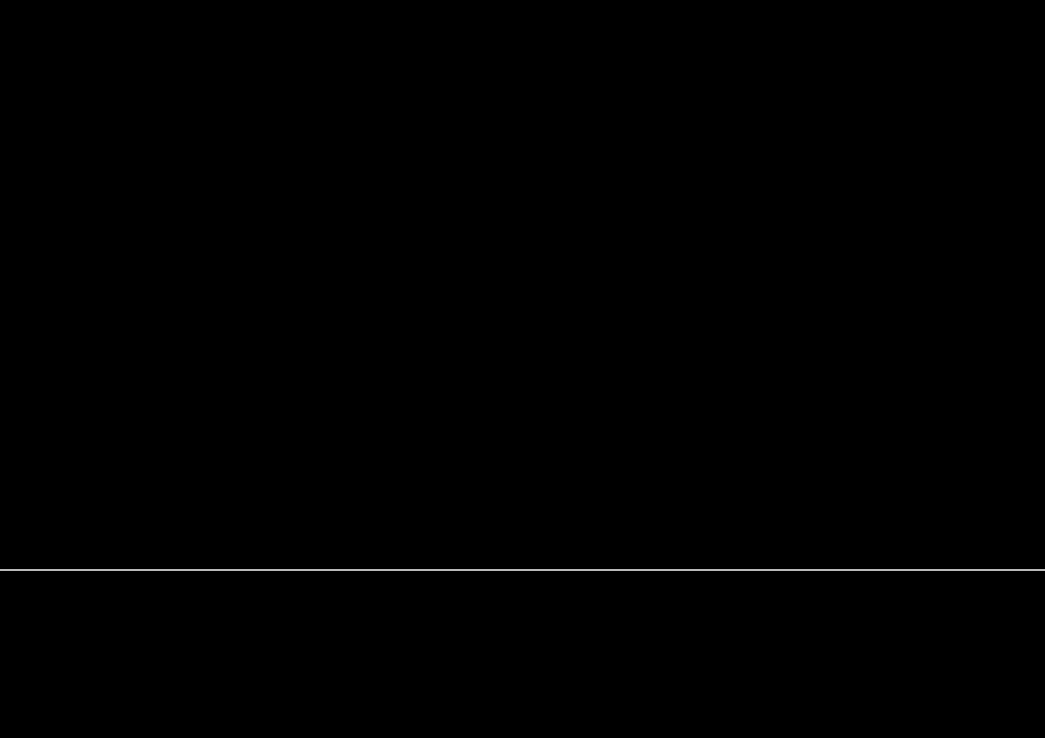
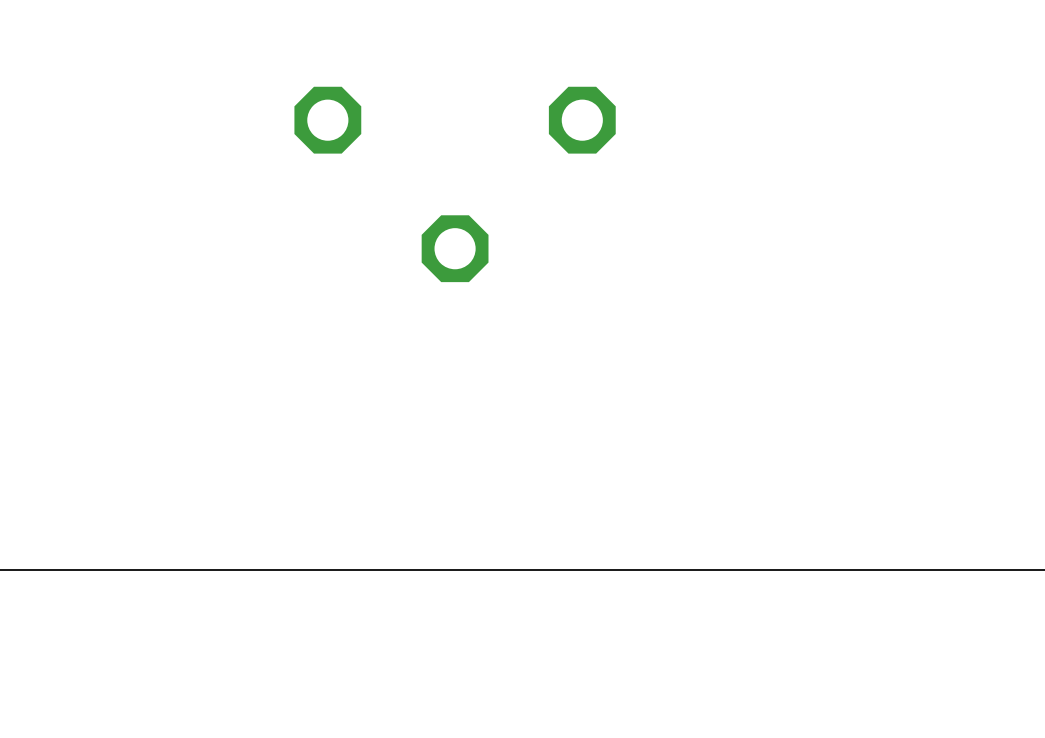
part: none -> (455, 184)

